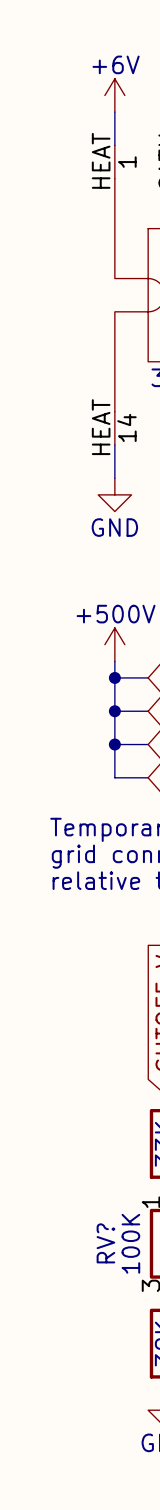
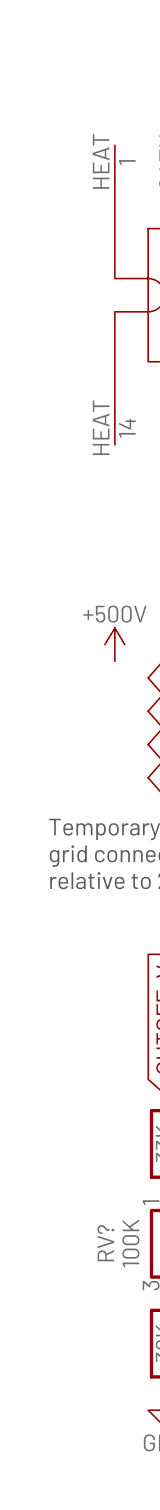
power symbol: +6V (114, 95) -> none
wire: (114, 112) (114, 145) -> none
wire: (114, 444) (114, 478) -> none
power symbol: GND (114, 494) -> none
wire: (114, 661) (114, 777) (148, 777) -> none
wire: (114, 677) (148, 677) -> none
junction: (114, 677) -> none
wire: (114, 711) (148, 711) -> none
junction: (114, 711) -> none
wire: (114, 744) (148, 744) -> none
junction: (114, 744) -> none

